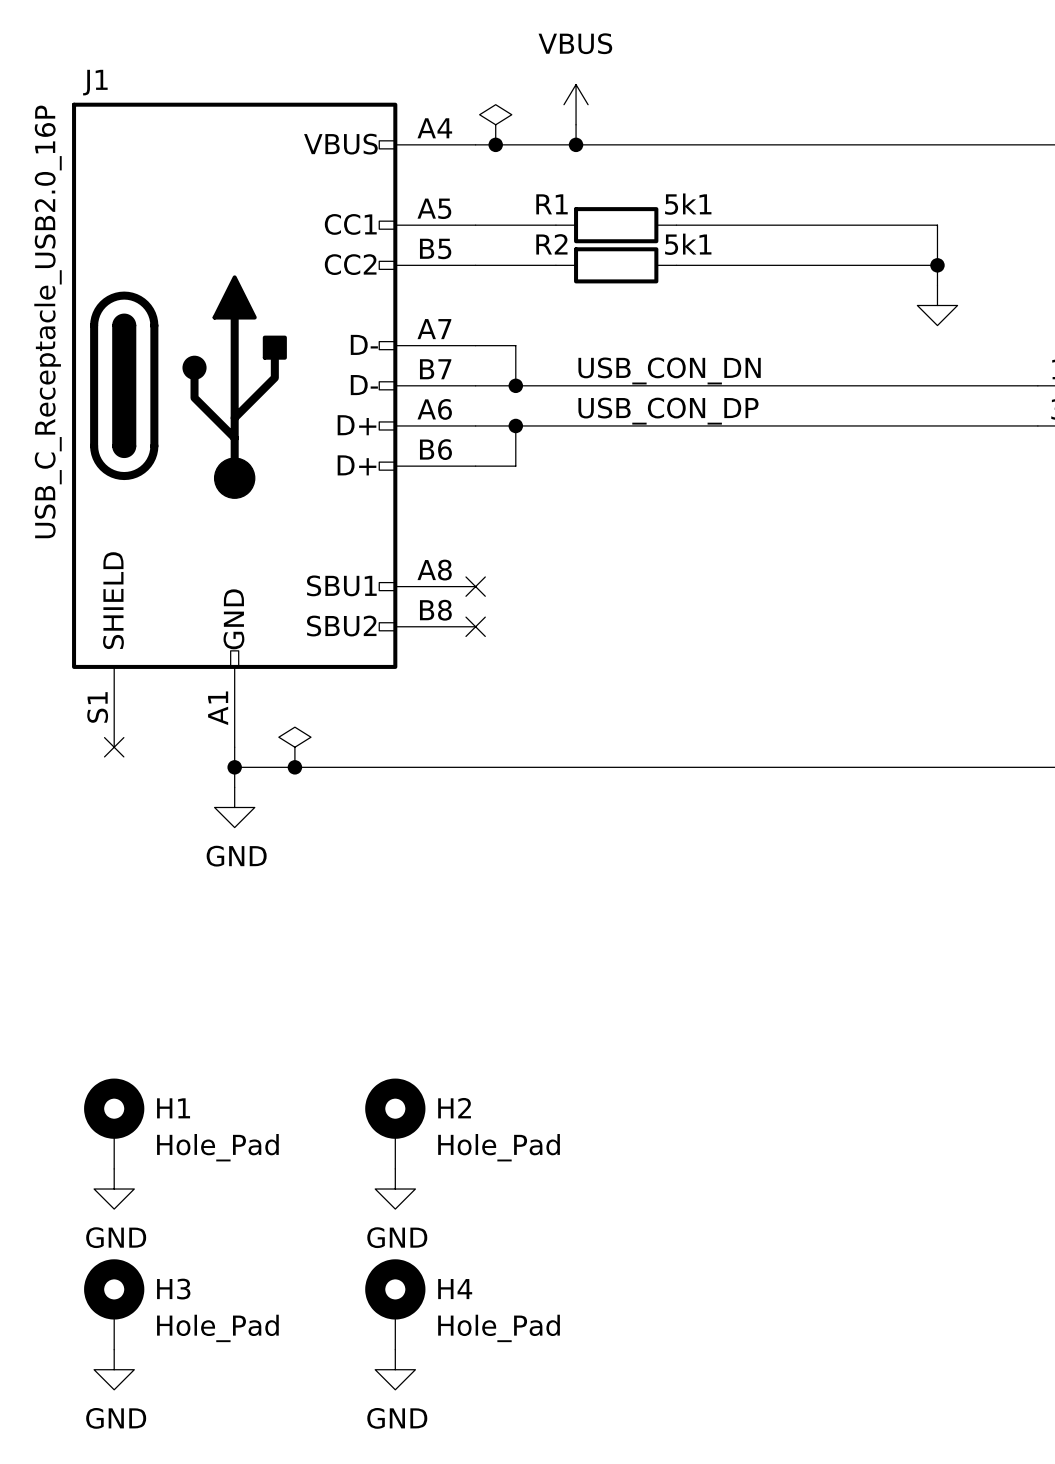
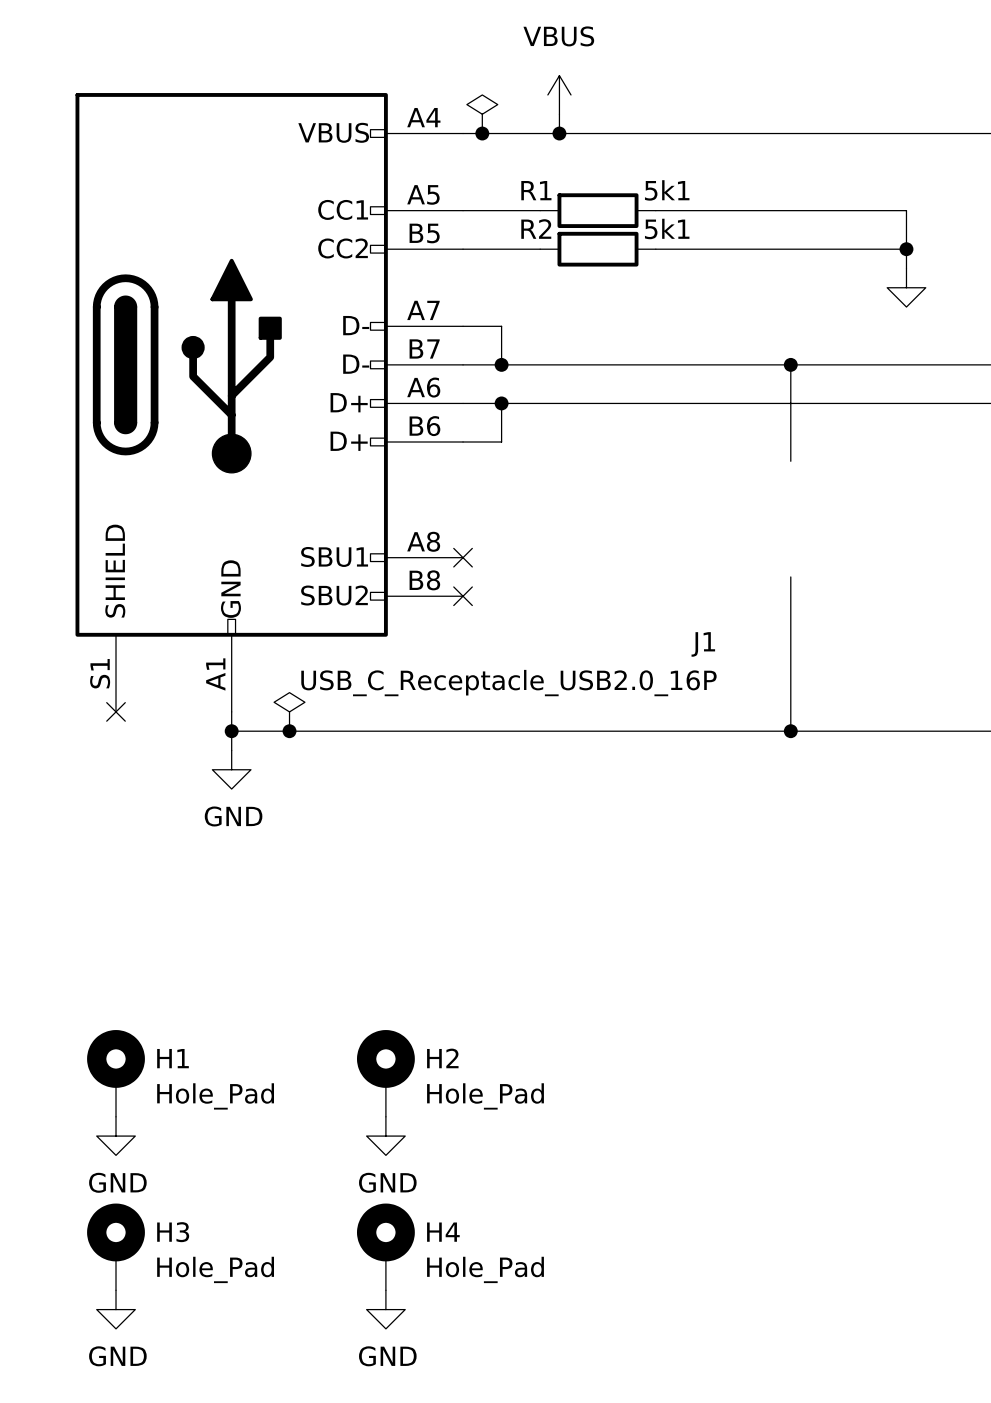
J1 name position: J1 (95, 82) -> J1 (703, 644)
J1 value rotation: 0° (48, 321) -> 90° clockwise (508, 683)
J1 value position: USB_C_Receptacle_USB2.0_16P (48, 321) -> USB_C_Receptacle_USB2.0_16P (508, 683)
label: USB_CON_DN (669, 370) -> none
wire: none -> (790, 364) (790, 461)
junction: none -> (790, 364)
label: USB_CON_DP (668, 411) -> none
wire: none -> (790, 576) (790, 731)
junction: none -> (790, 731)

